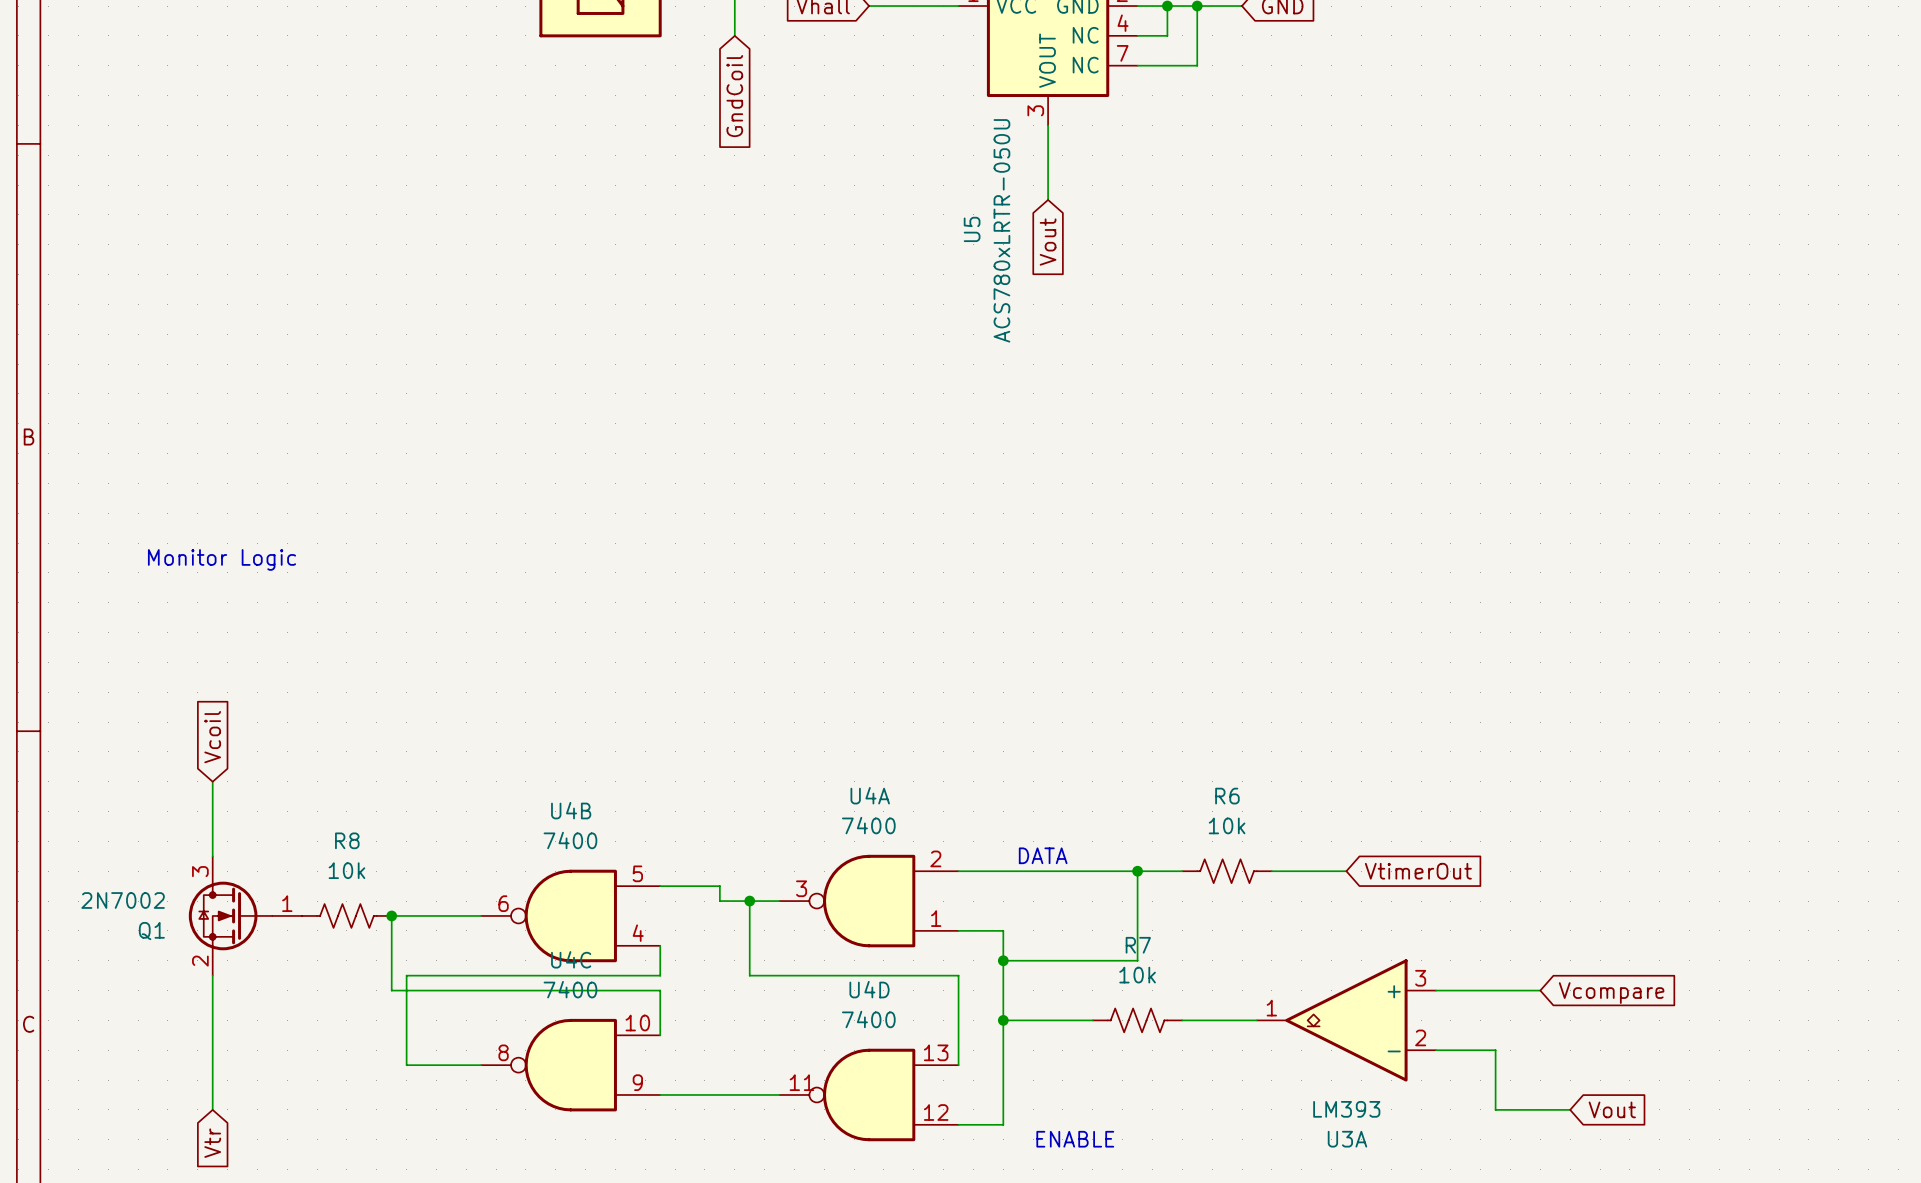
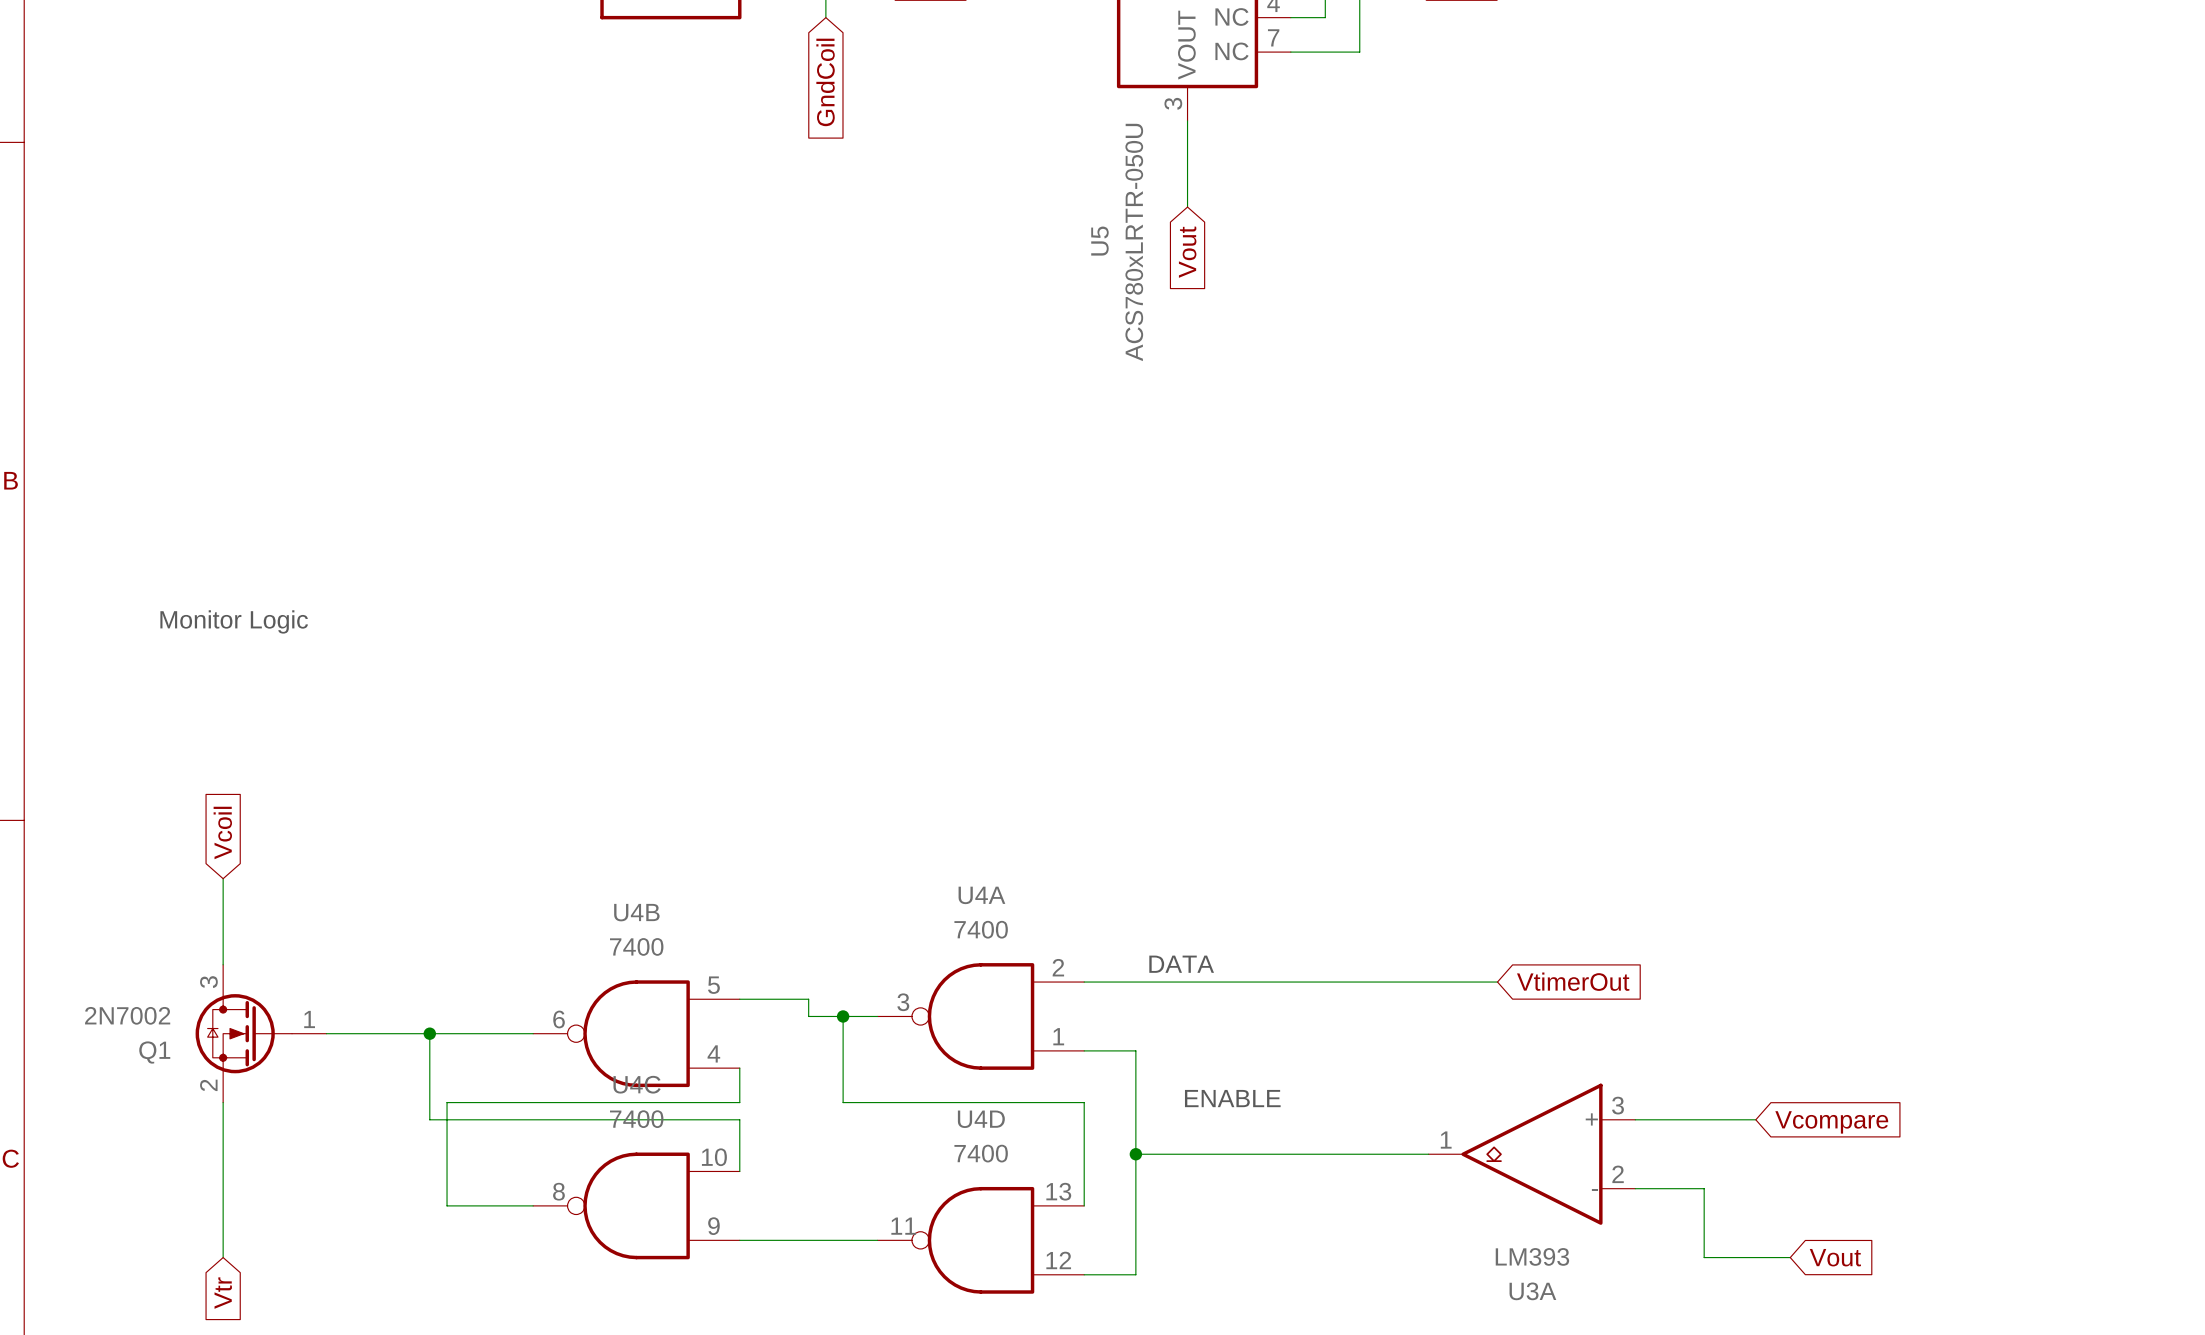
wire: (1137, 871) (1137, 960) (1003, 960) -> none
junction: (1137, 871) -> none
wire: none -> (1342, 982) (1445, 982)
R6: 10k (1227, 871) -> none
wire: (1316, 871) (1346, 871) -> none
global label position: VtimerOut (1418, 871) -> VtimerOut (1573, 981)
wire: none -> (326, 1033) (429, 1033)
R8: 10k (346, 915) -> none
junction: (1003, 960) -> none
wire: none -> (1239, 1154) (1342, 1154)
R7: 10k (1137, 1020) -> none
text position: ENABLE (1075, 1139) -> ENABLE (1232, 1098)

